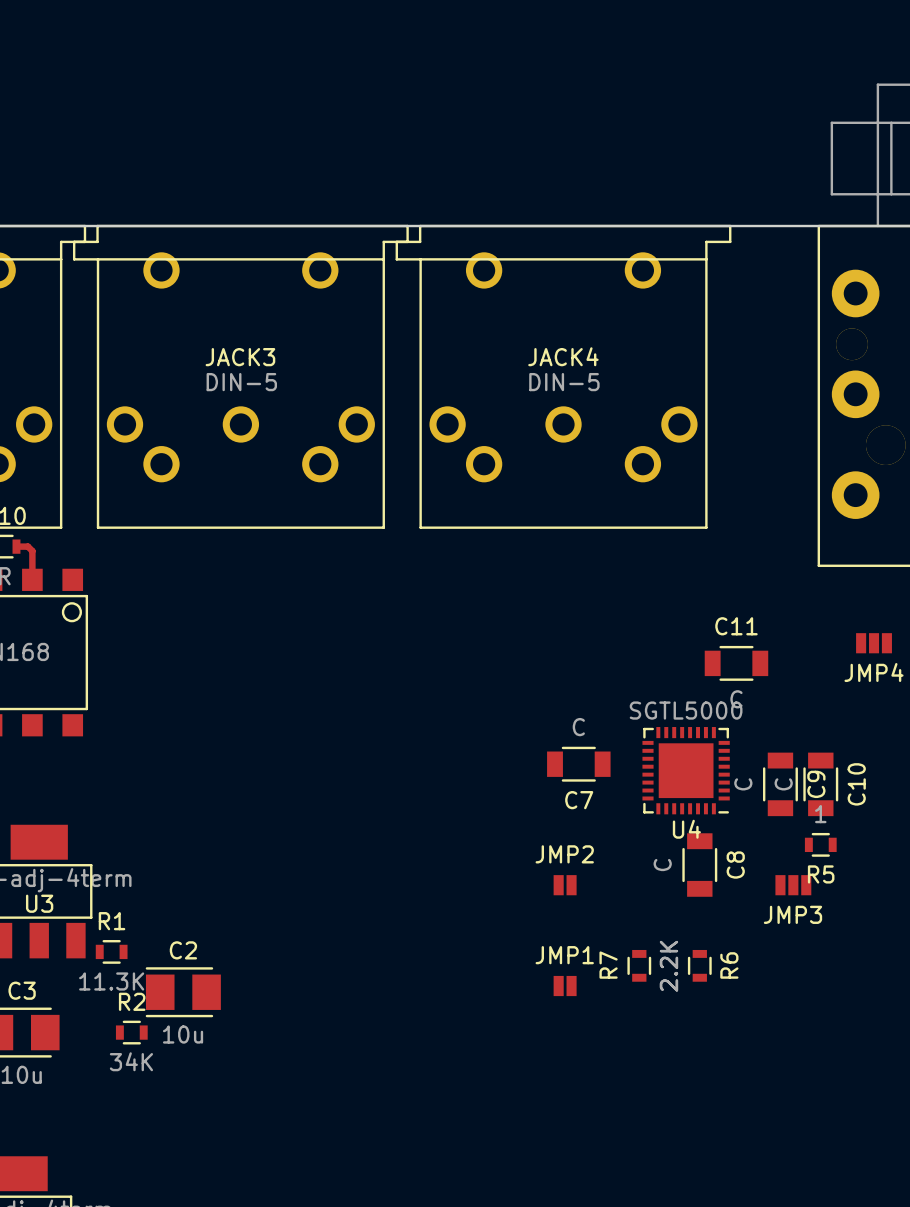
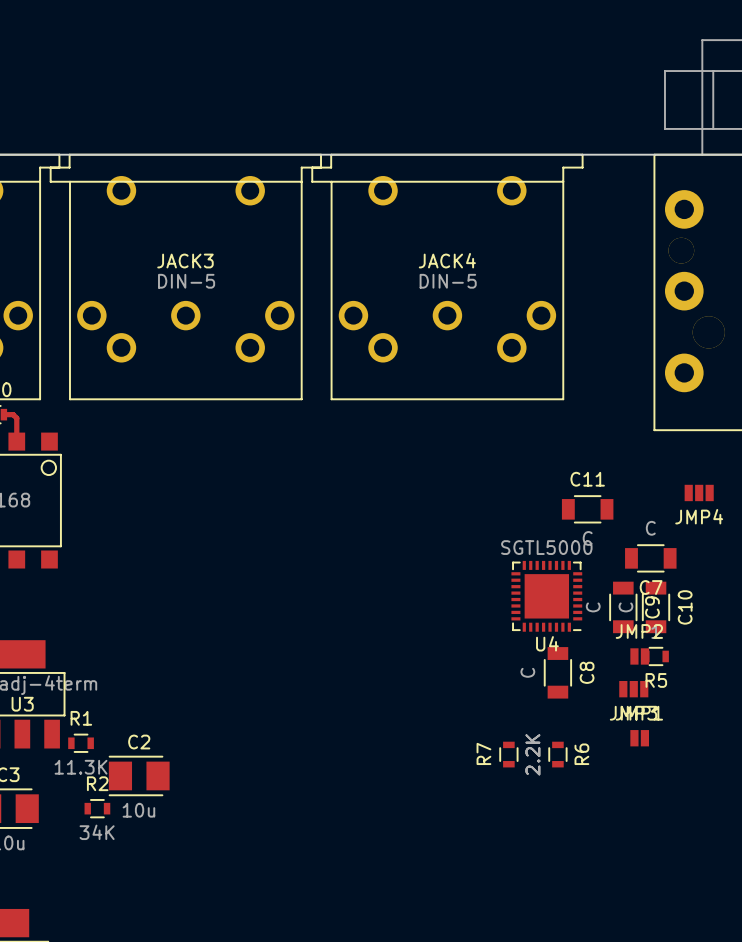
C7 position: (578, 764) -> (650, 558)
JMP2 position: (565, 885) -> (639, 656)
JMP1 position: (565, 986) -> (639, 738)

